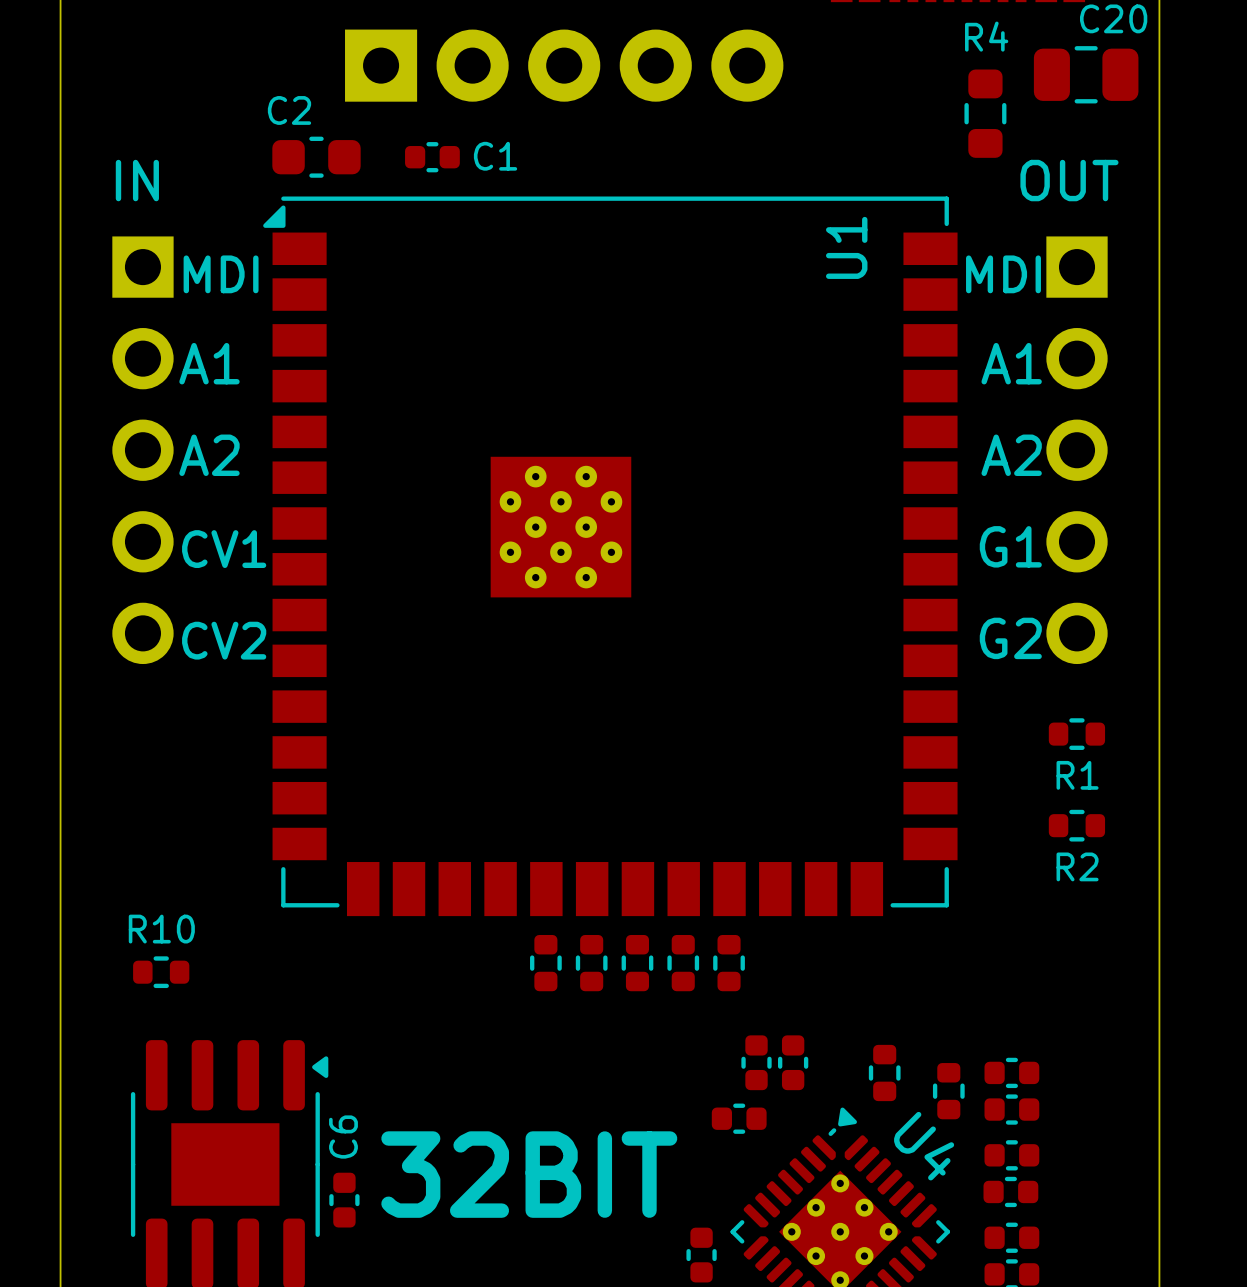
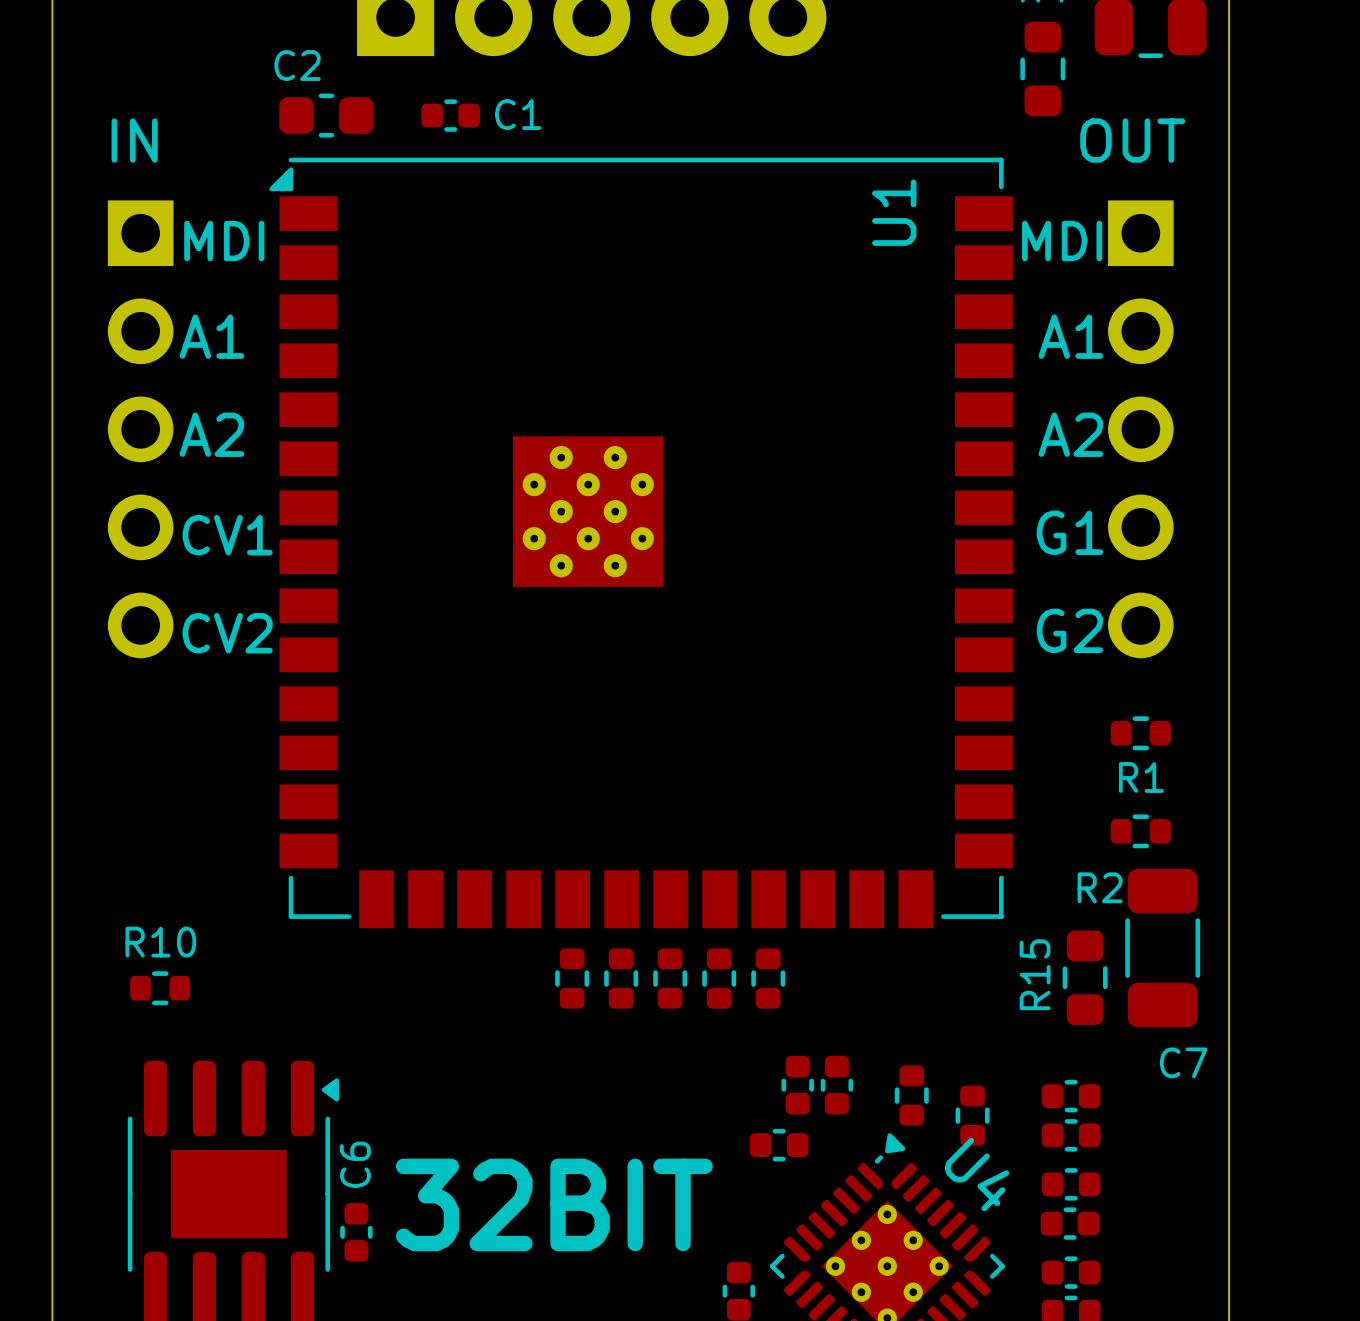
R2 name position: R2 (1077, 866) -> R2 (1100, 887)
C7: none -> (1162, 948)
R15: none -> (1085, 977)
part: none -> (911, 1095)
part: (884, 1072) -> none
part: none -> (972, 1115)
part: (948, 1091) -> none

